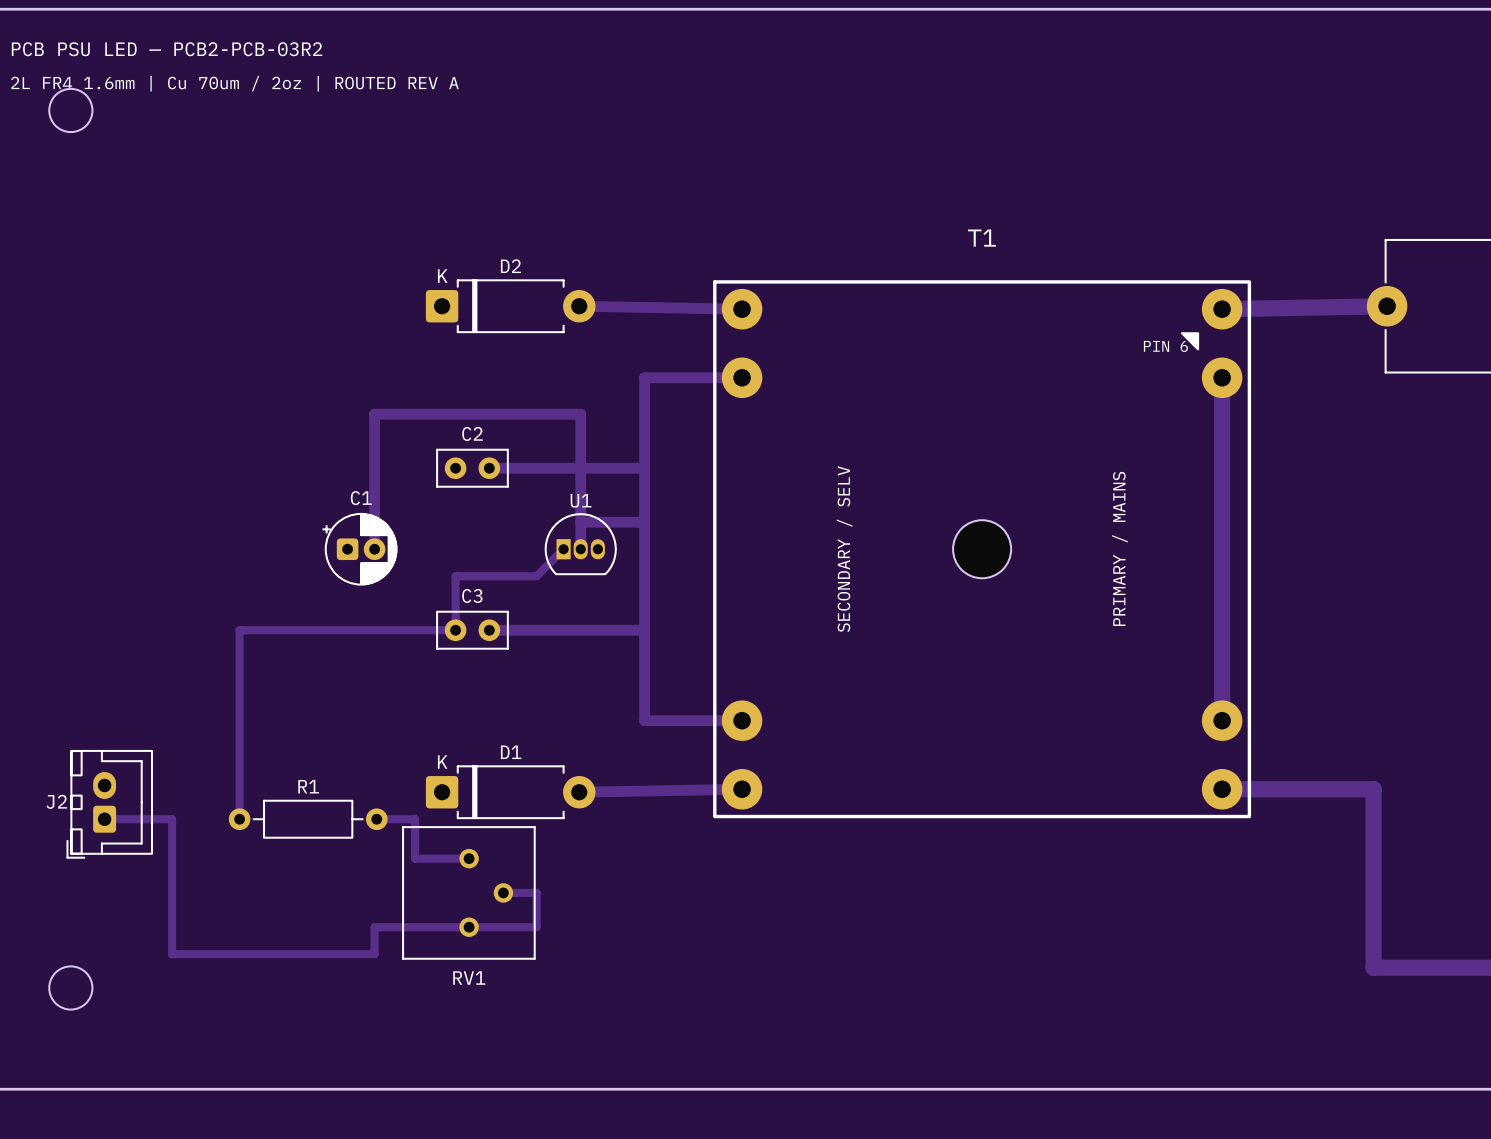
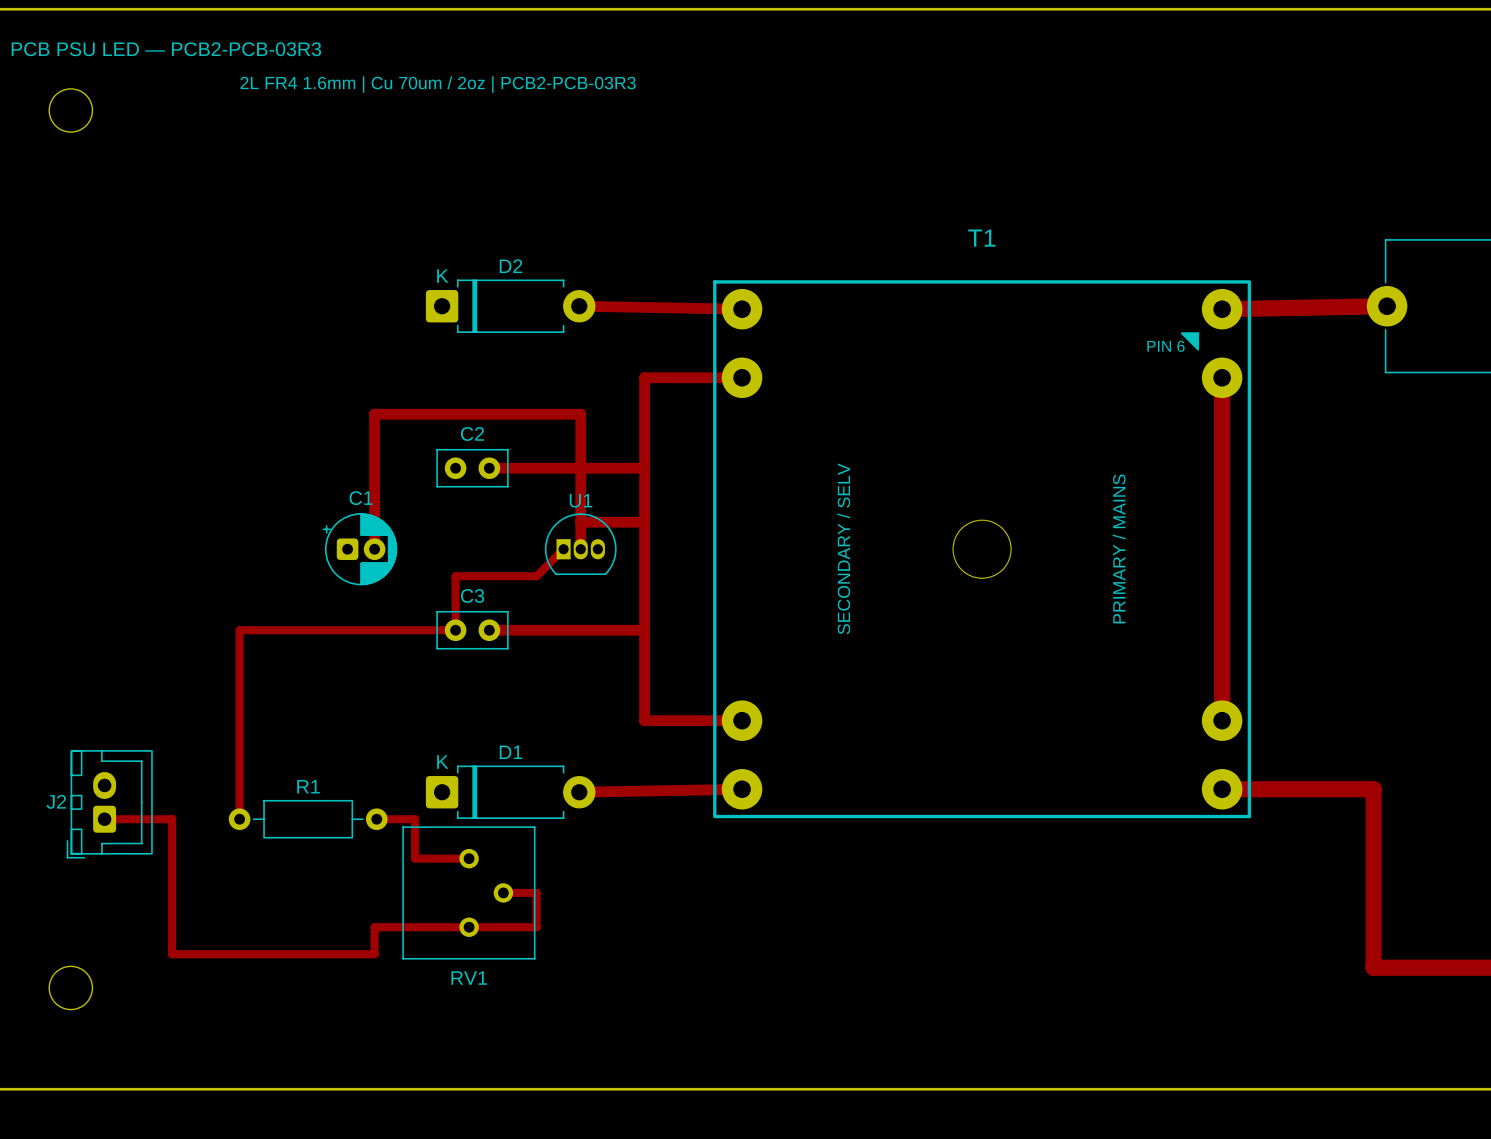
text: PCB PSU LED — PCB2-PCB-03R2 (167, 49) -> PCB PSU LED — PCB2-PCB-03R3 (166, 49)
text: 2L FR4 1.6mm | Cu 70um / 2oz | ROUTED REV A (234, 83) -> 2L FR4 1.6mm | Cu 70um / 2oz | PCB2-PCB-03R3 (438, 84)

